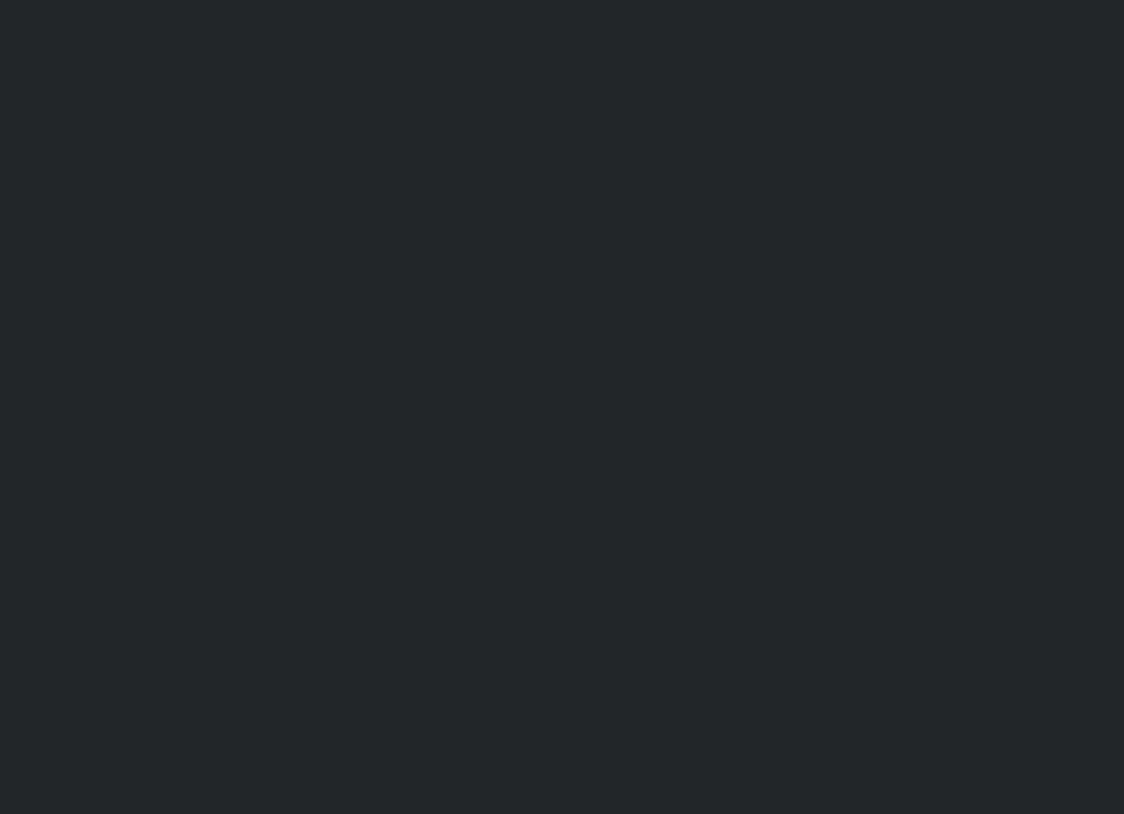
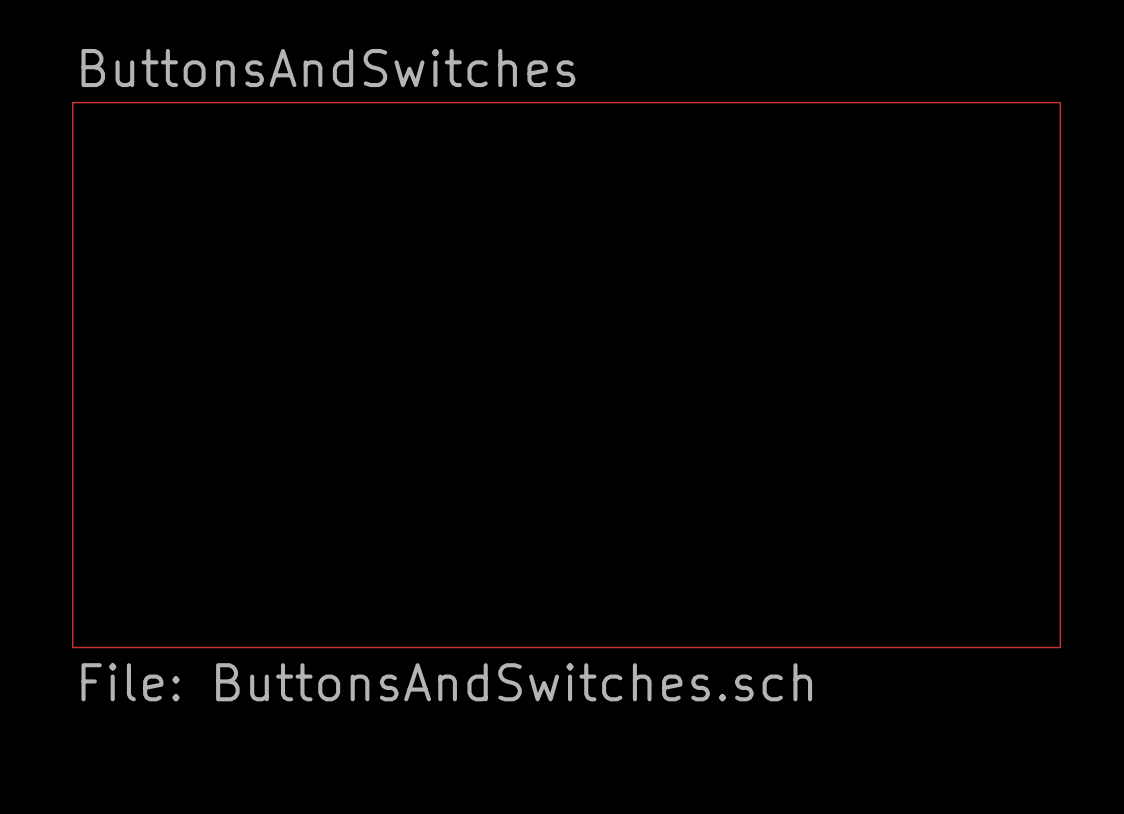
sheet ButtonsAndSwitches: none -> File: ButtonsAndSwitches.sch (566, 375)

